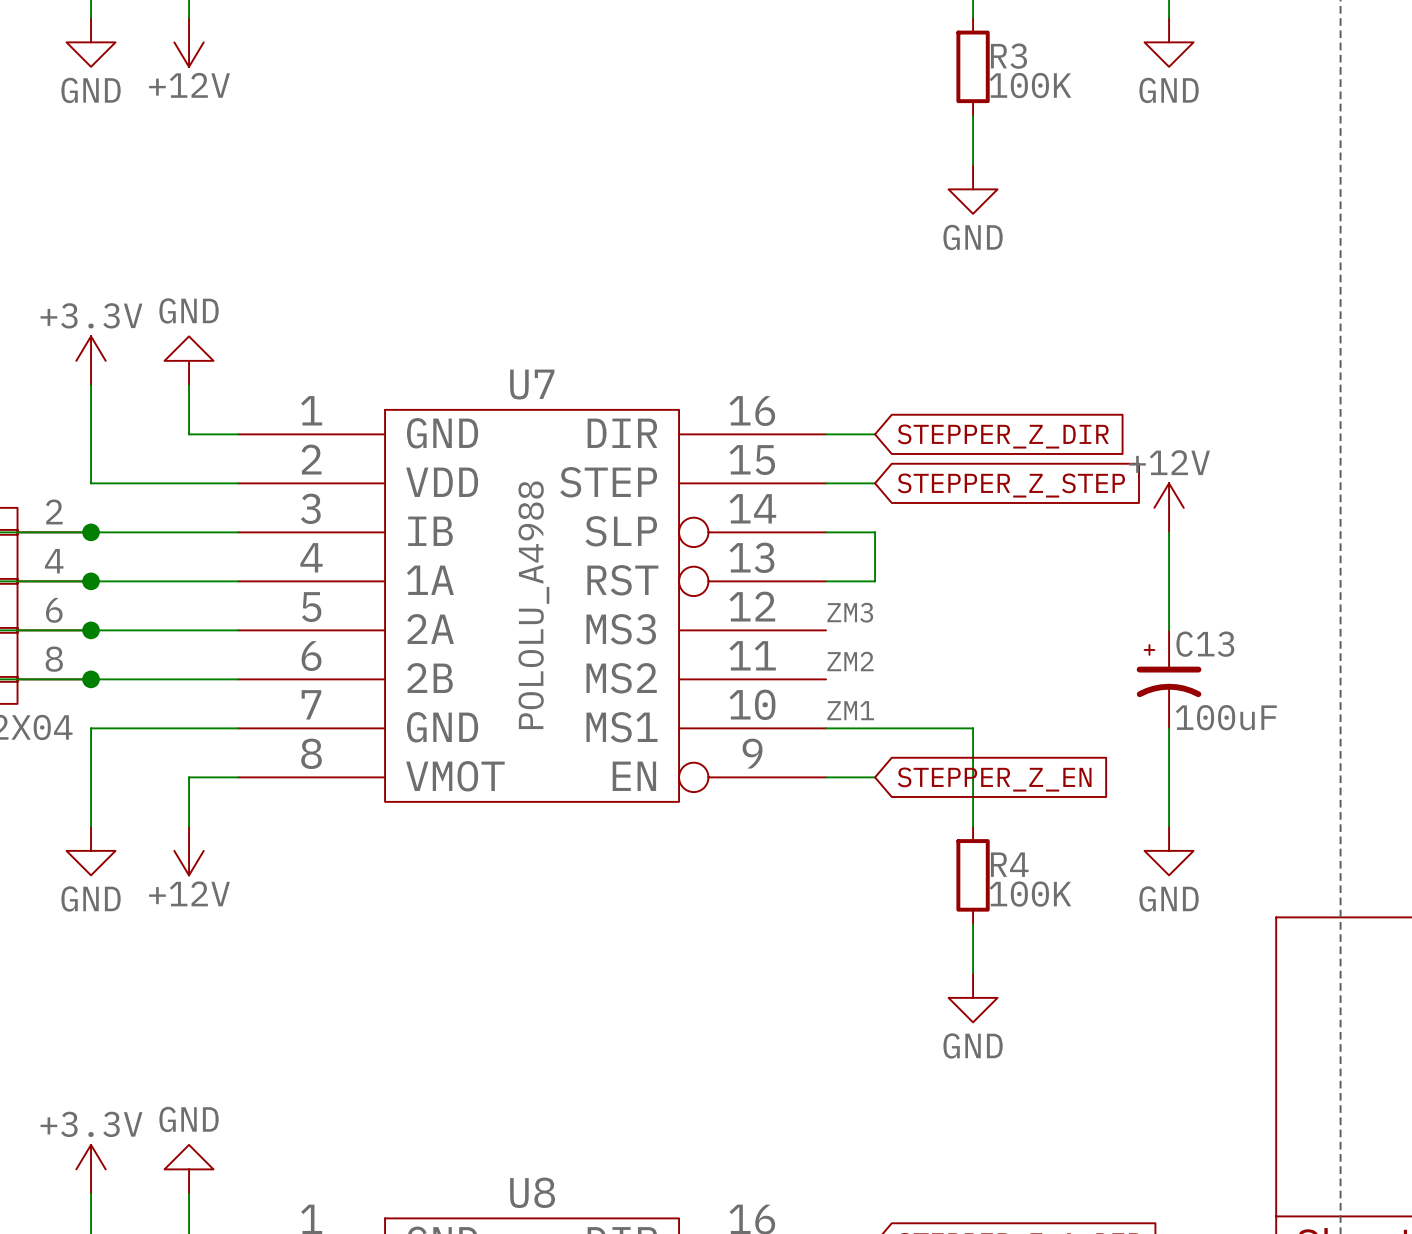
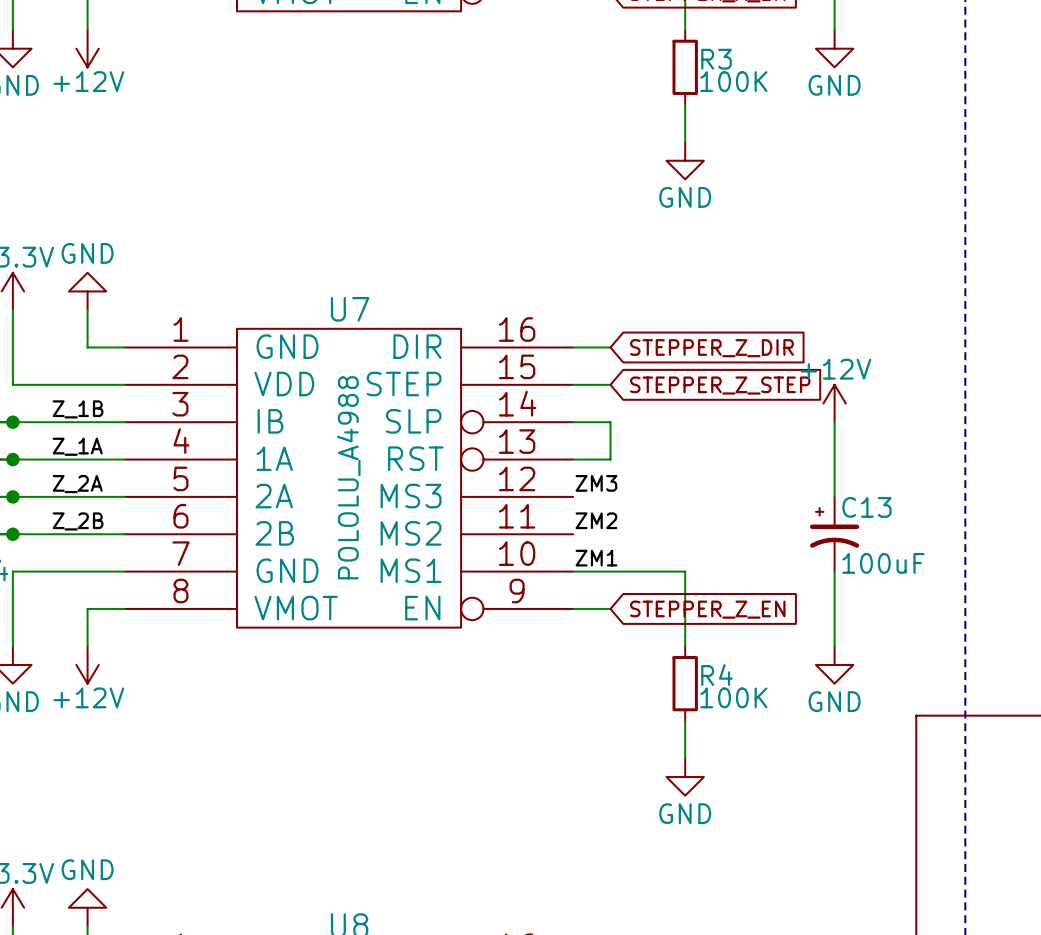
label: none -> Z_1B (78, 409)
label: none -> Z_1A (77, 446)
label: none -> Z_2A (77, 484)
label: none -> Z_2B (78, 521)

